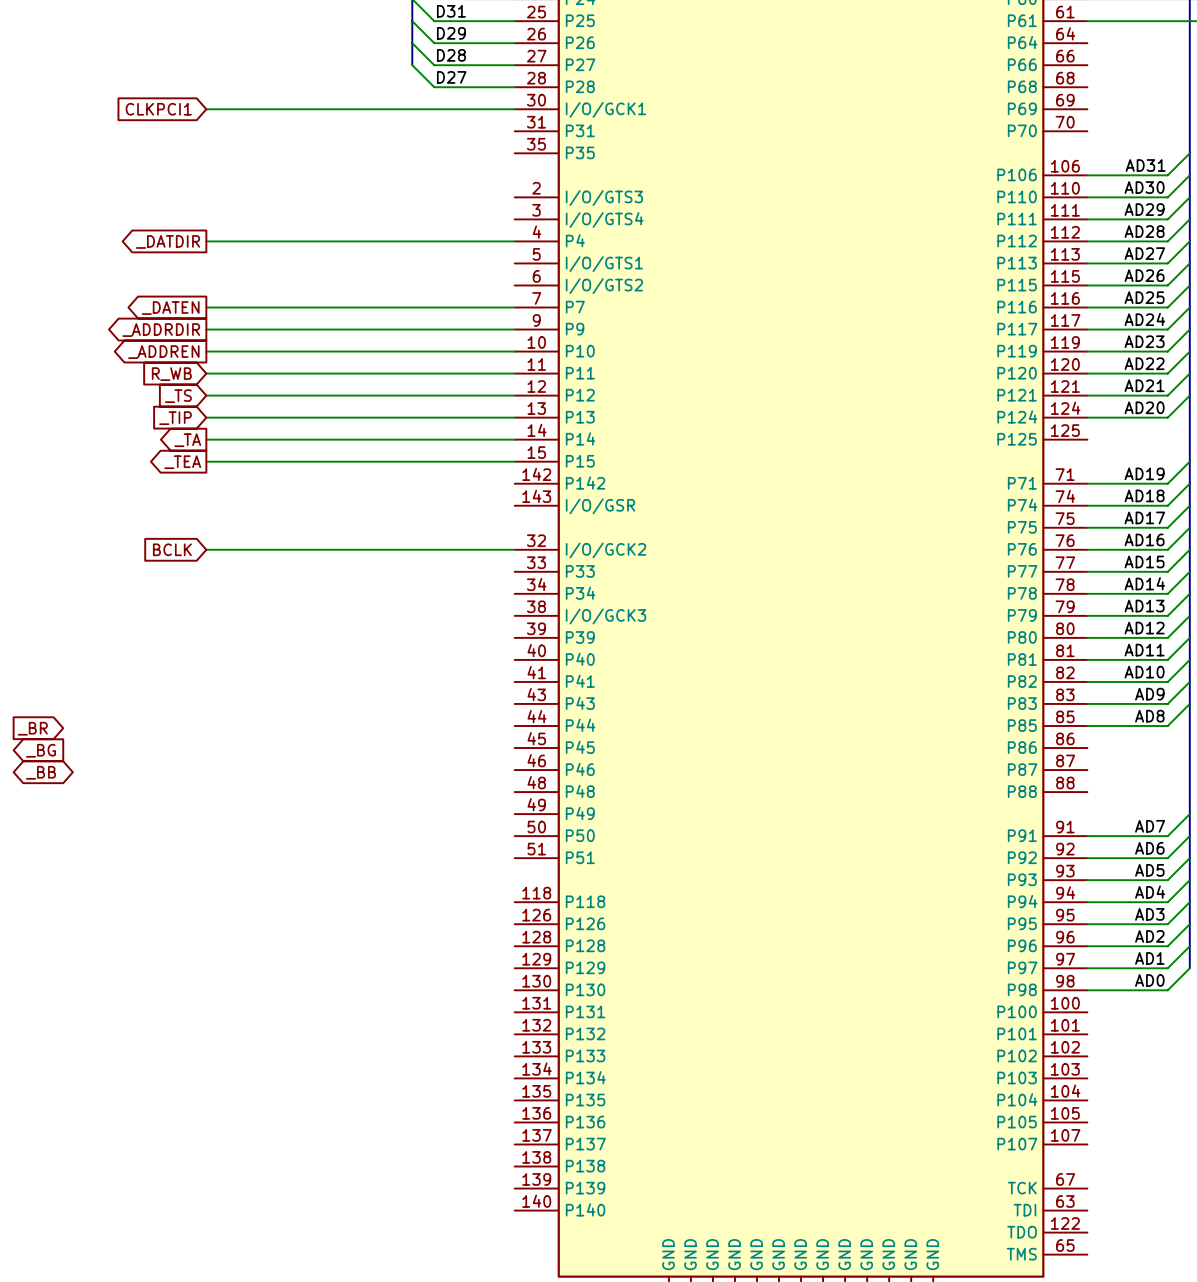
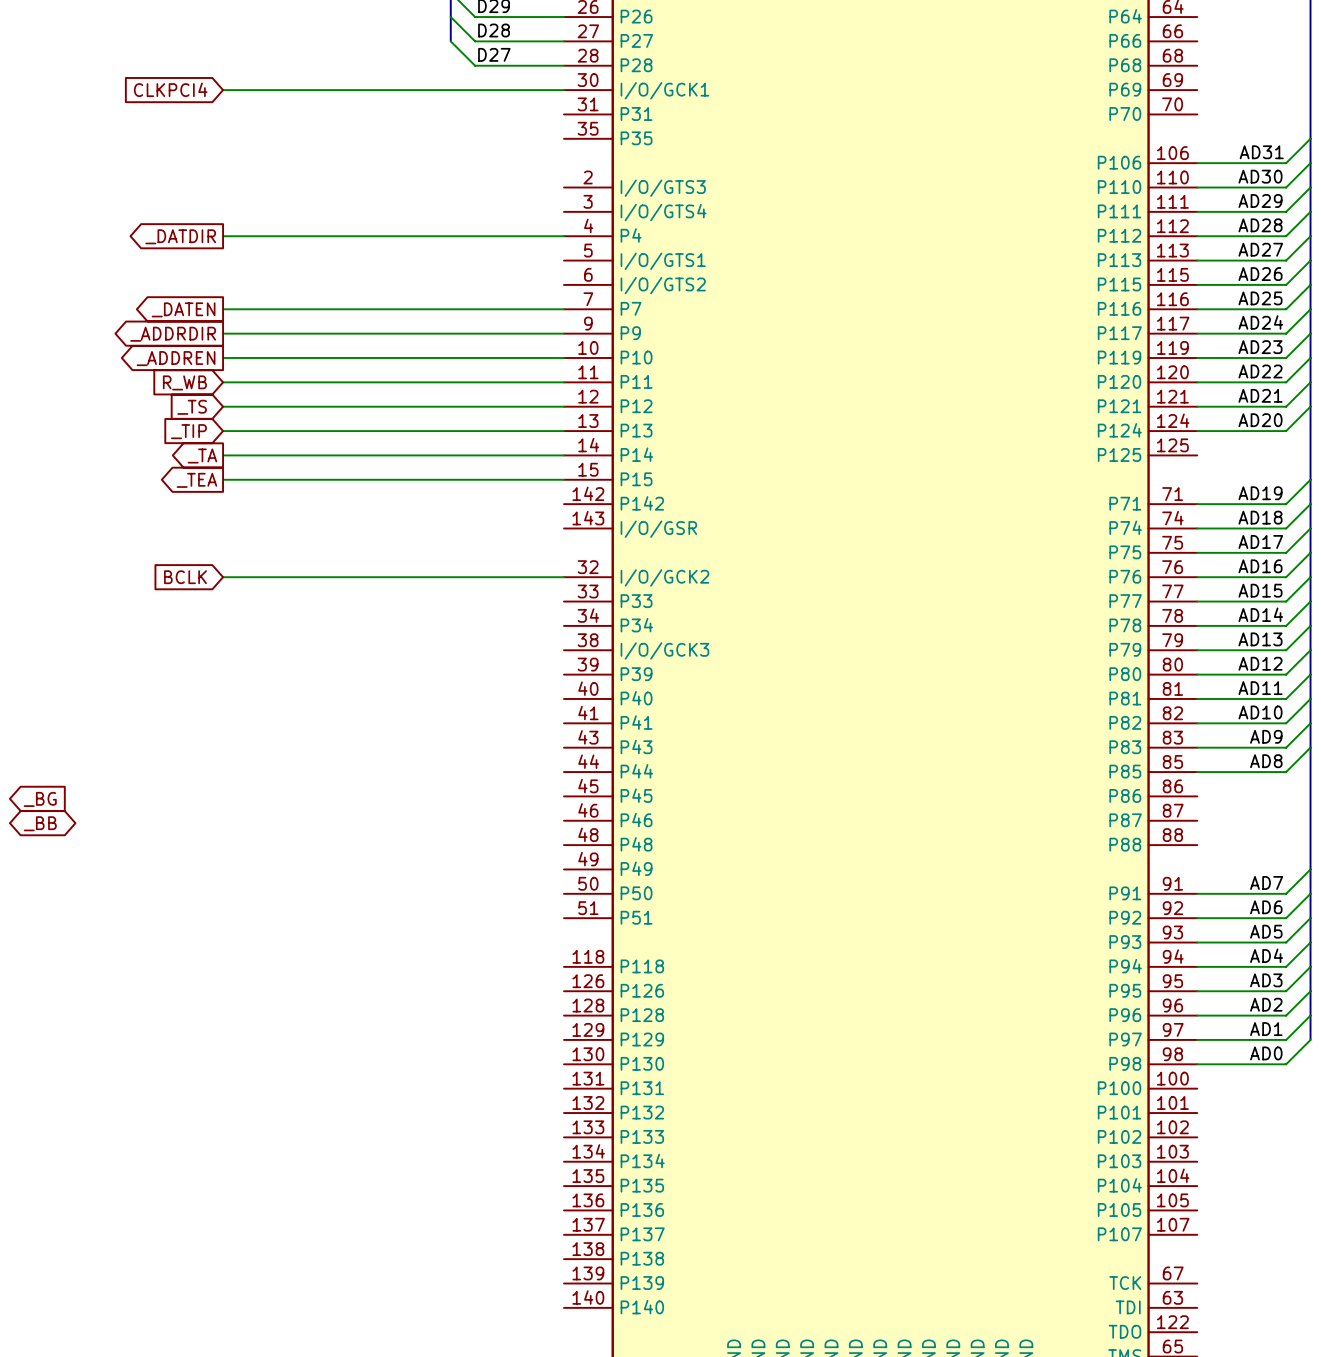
global label: CLKPCI1 (158, 109) -> CLKPCI4 (170, 89)
global label: _BR (32, 728) -> none

